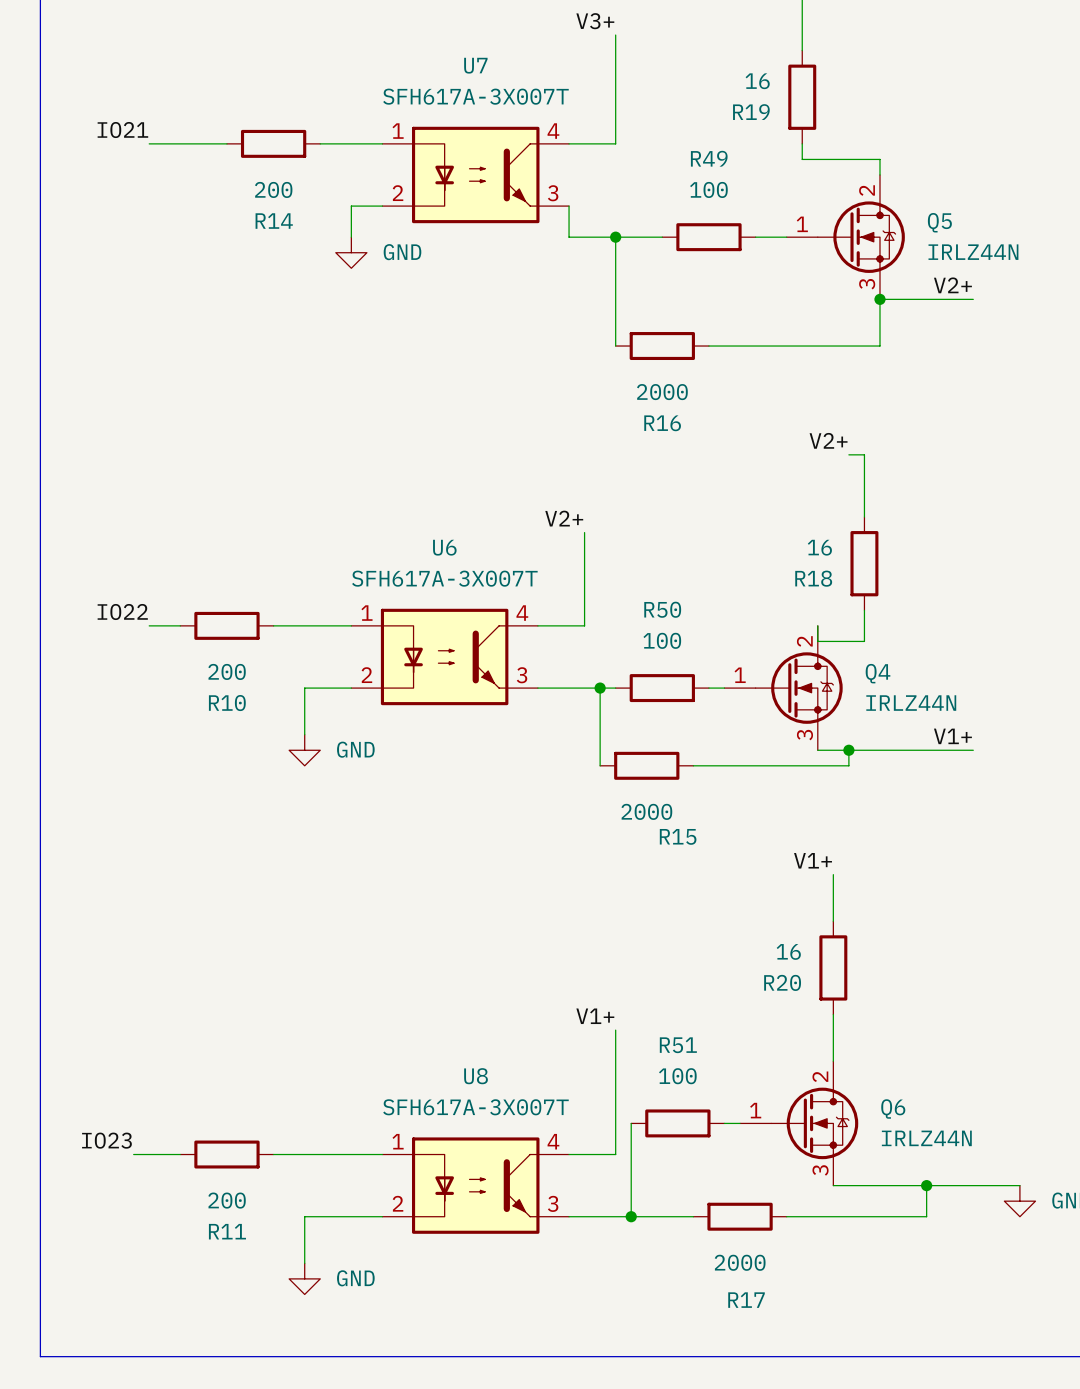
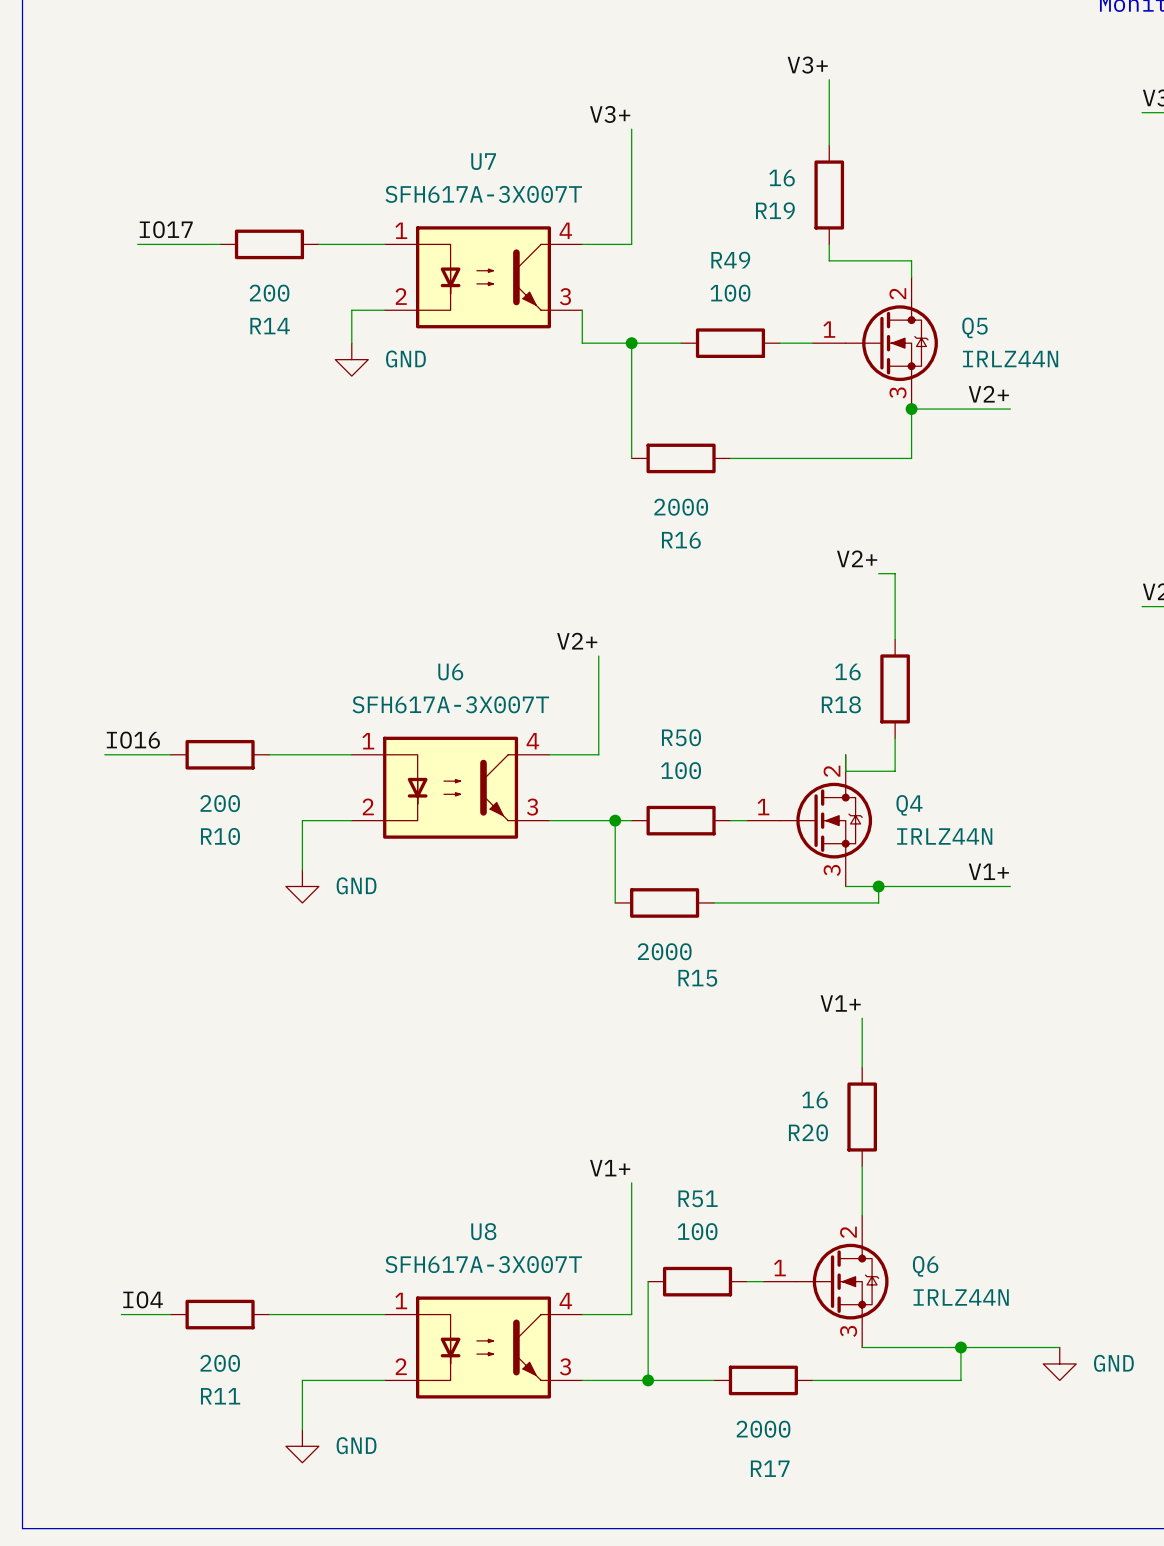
label: IO21 (122, 130) -> IO17 (166, 229)
label: IO22 (122, 612) -> none
label: none -> IO16 (133, 740)
wire: none -> (104, 754) (137, 754)
label: IO23 (106, 1140) -> IO4 (143, 1299)

